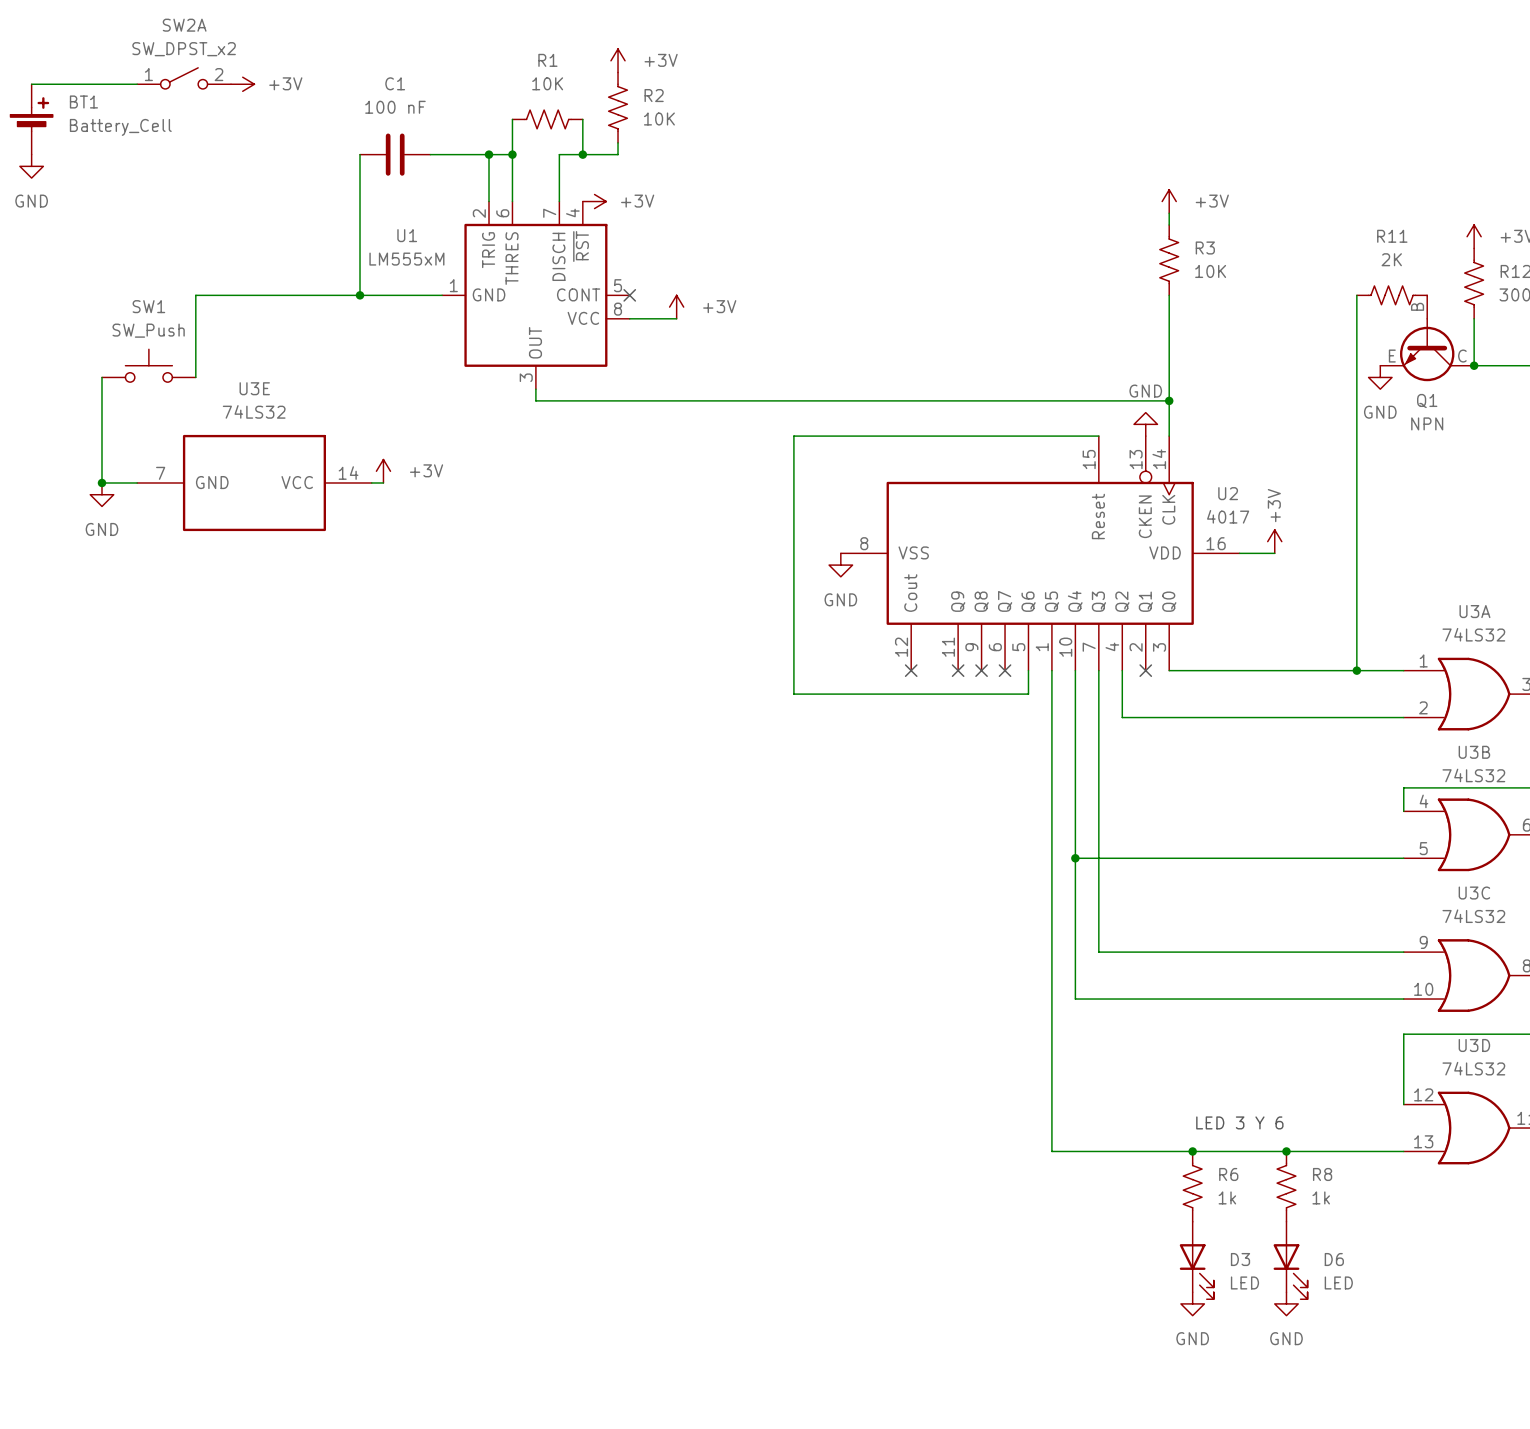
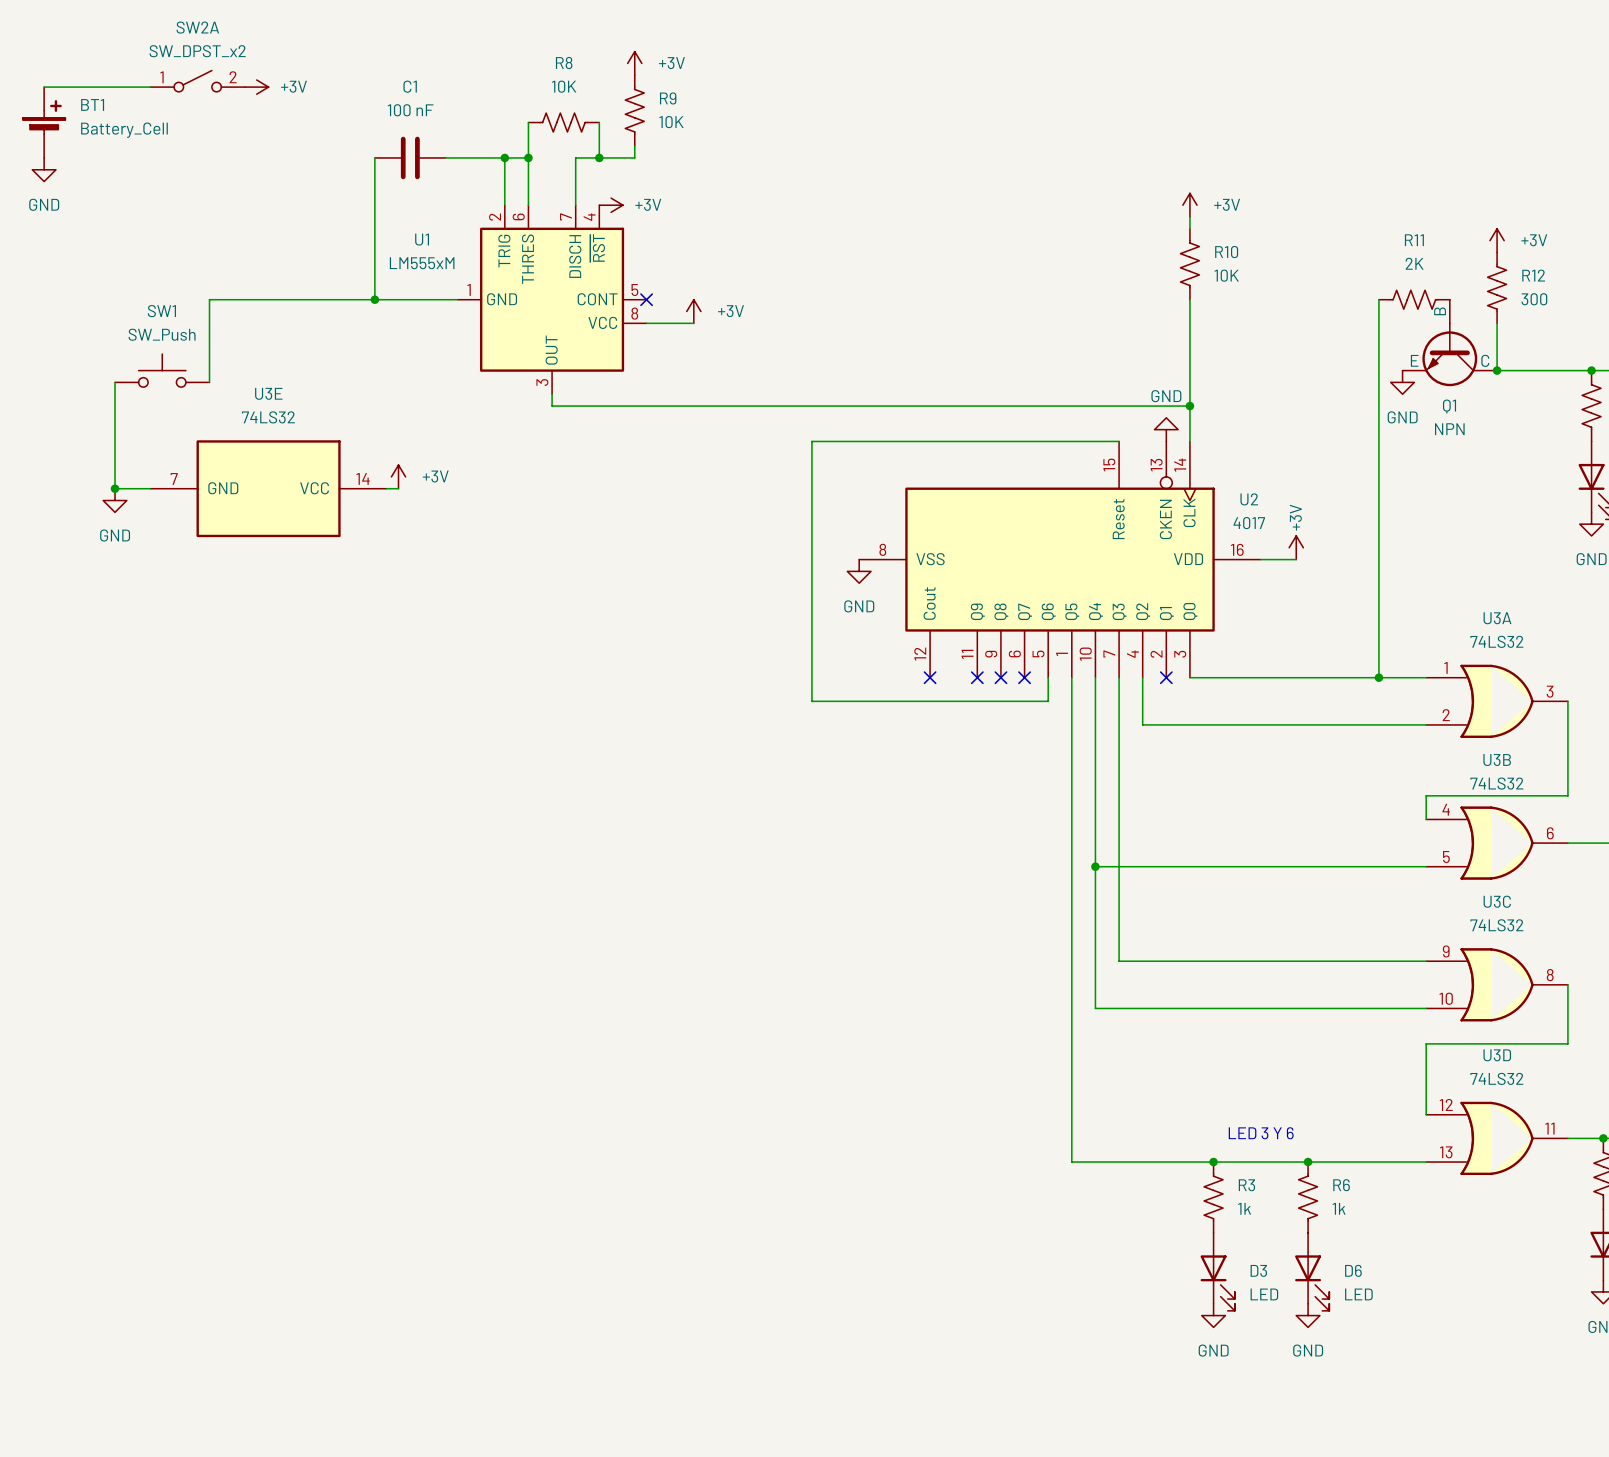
R1 name: R1 (547, 60) -> R8 (564, 63)
R2 name: R2 (654, 95) -> R9 (668, 98)
R3 name: R3 (1205, 248) -> R10 (1226, 252)
R6 name: R6 (1228, 1174) -> R3 (1246, 1185)
R8 name: R8 (1322, 1174) -> R6 (1341, 1185)

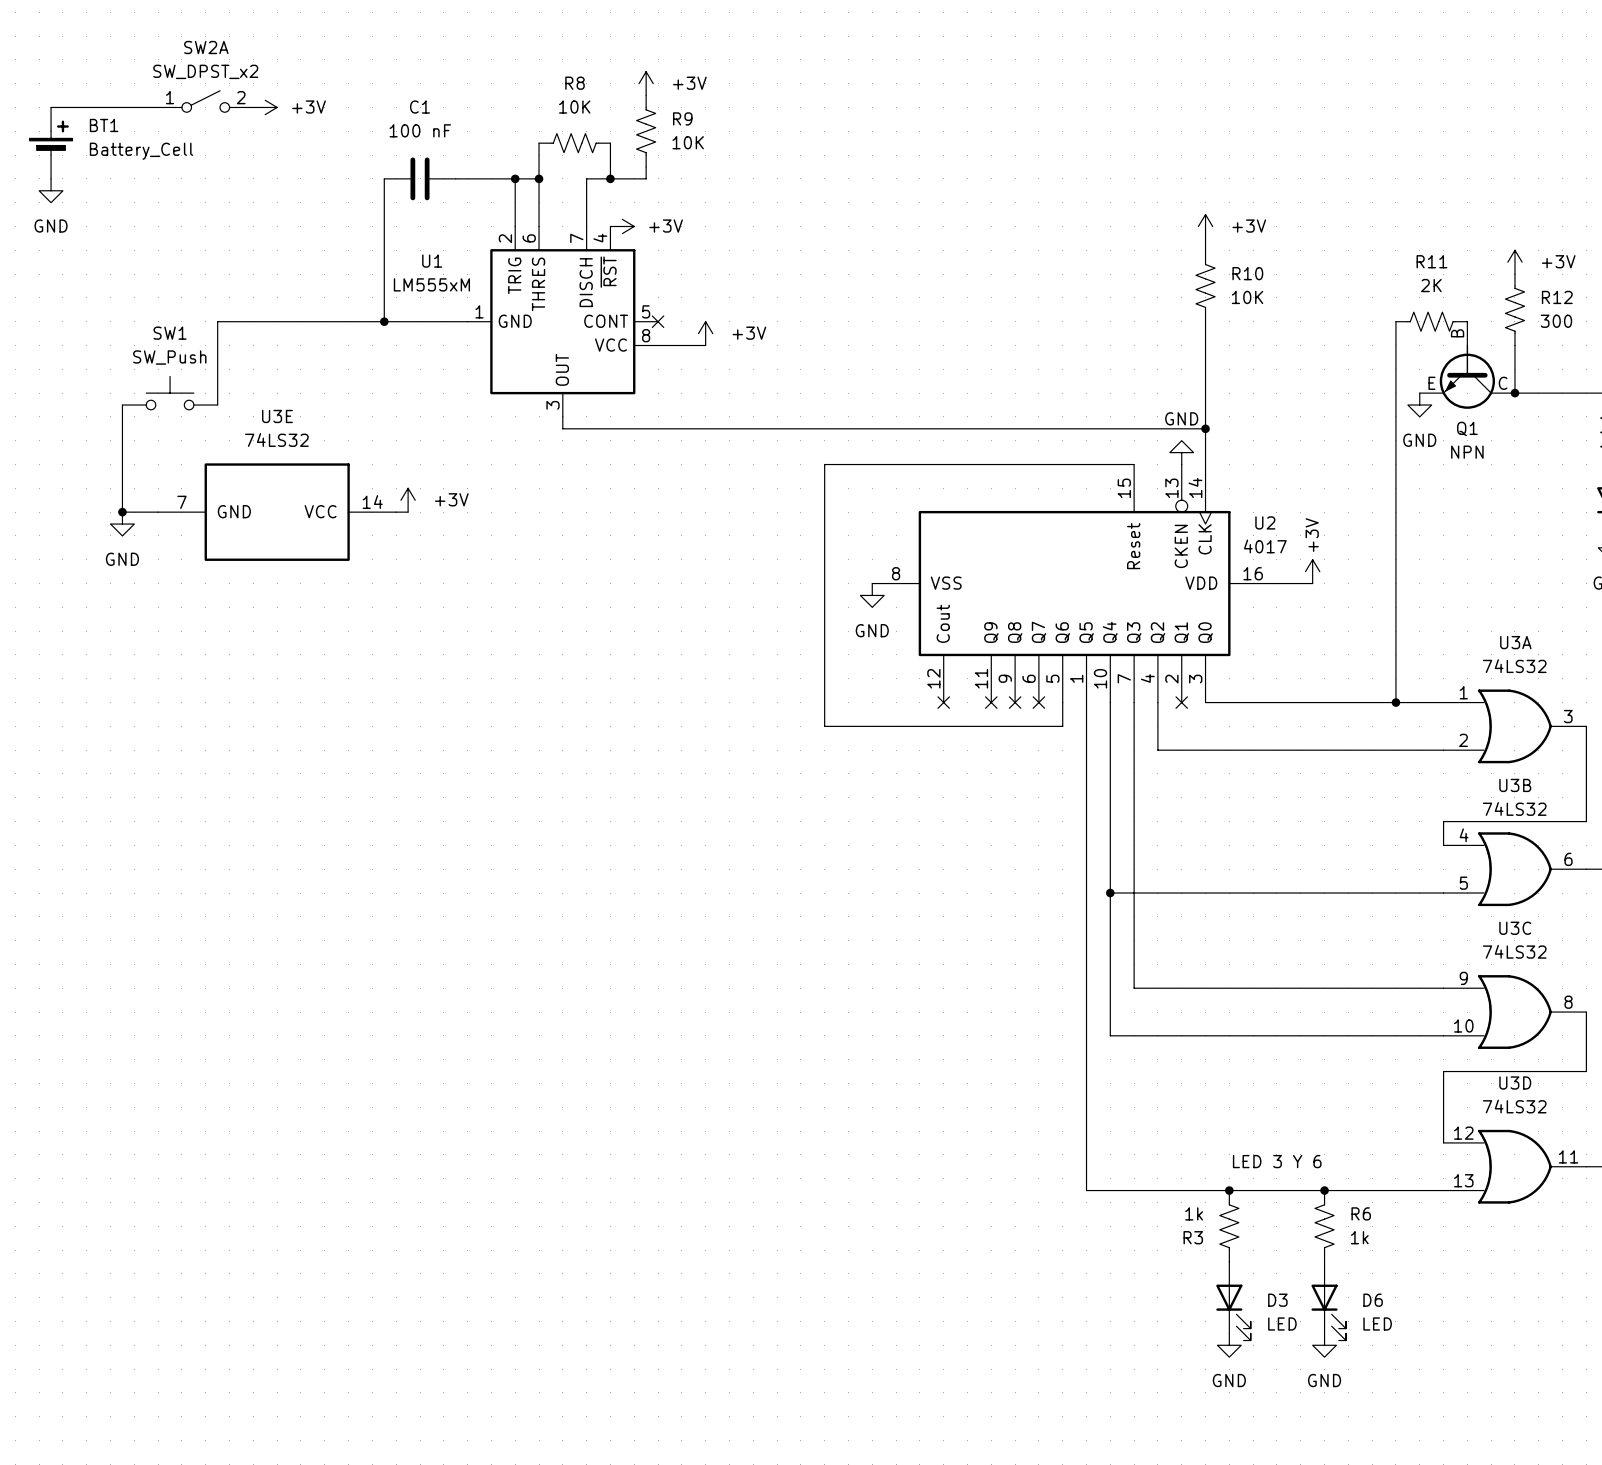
R3 name position: R3 (1246, 1185) -> R3 (1193, 1237)
R3 value position: 1k (1244, 1208) -> 1k (1194, 1213)

